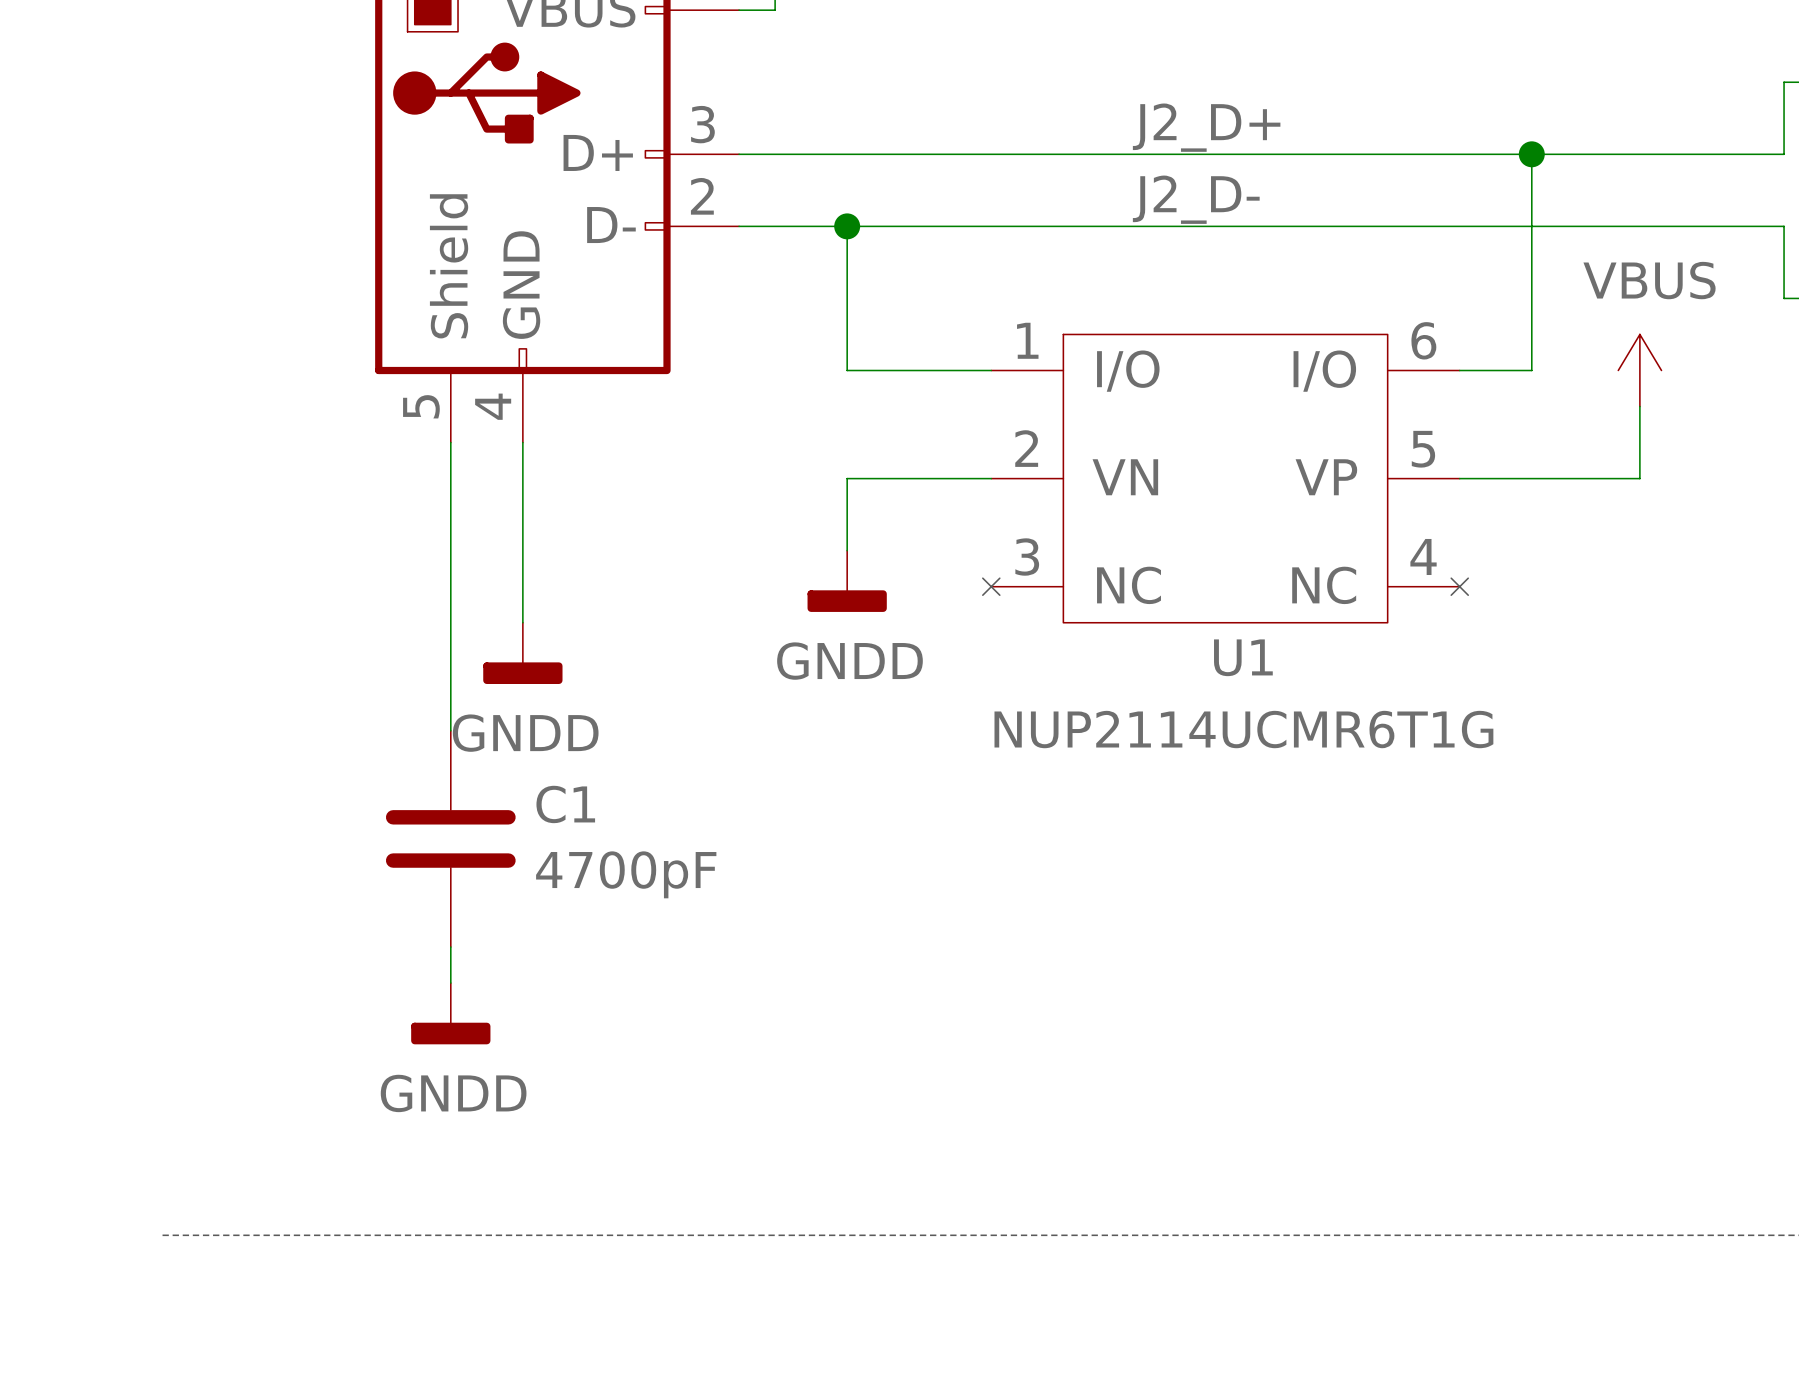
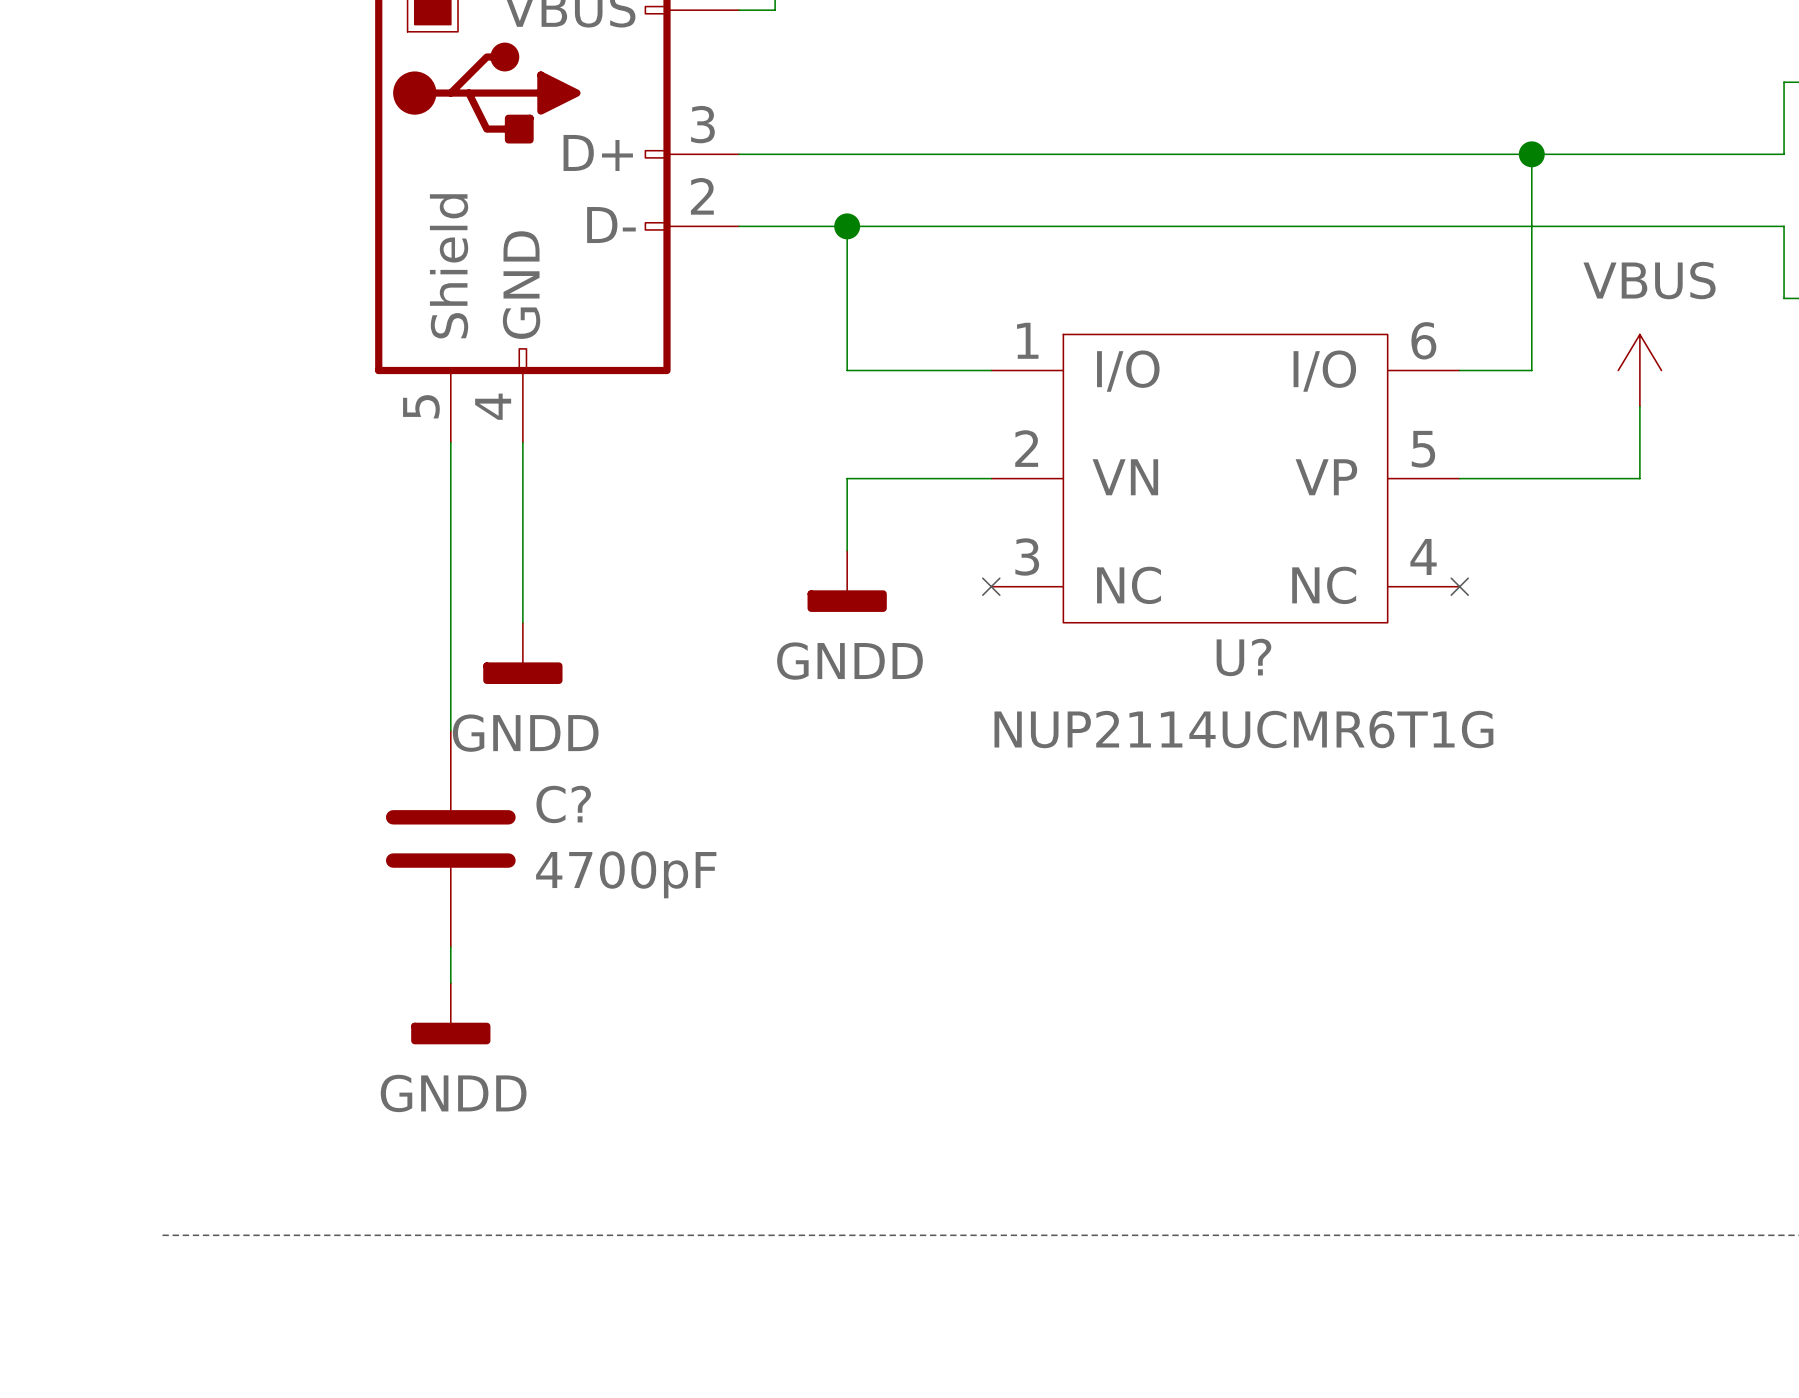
label: J2_D+ (1206, 127) -> none
label: J2_D- (1196, 199) -> none
U1 name: U1 (1243, 657) -> U? (1243, 657)
C1 name: C1 (565, 804) -> C? (563, 804)

